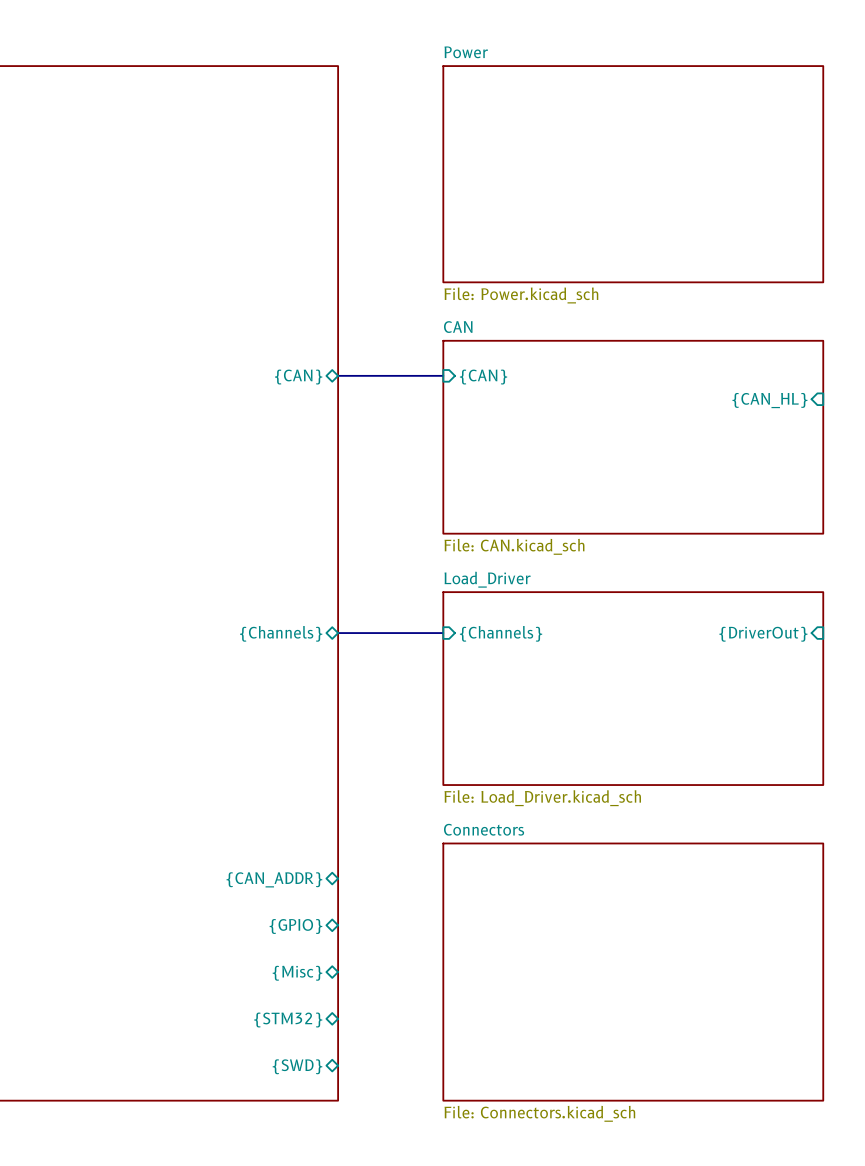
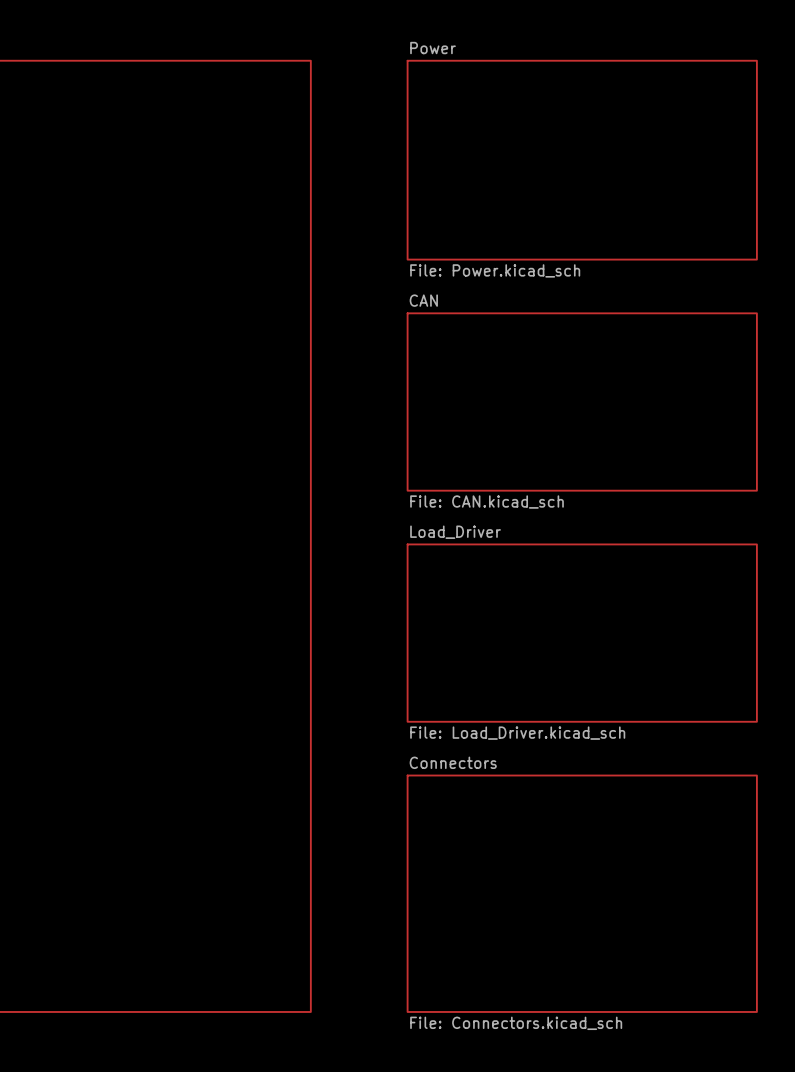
bus: (338, 375) (443, 375) -> none
sheet pin: {CAN} (298, 377) -> none
sheet pin: {CAN} (483, 377) -> none
sheet pin: {CAN_HL} (769, 400) -> none
sheet pin: {Channels} (281, 633) -> none
bus: (338, 633) (443, 633) -> none
sheet pin: {Channels} (501, 633) -> none
sheet pin: {DriverOut} (763, 634) -> none
sheet pin: {CAN_ADDR} (274, 879) -> none
sheet pin: {GPIO} (295, 926) -> none
sheet pin: {Misc} (297, 973) -> none
sheet pin: {STM32} (288, 1020) -> none
sheet pin: {SWD} (297, 1066) -> none

